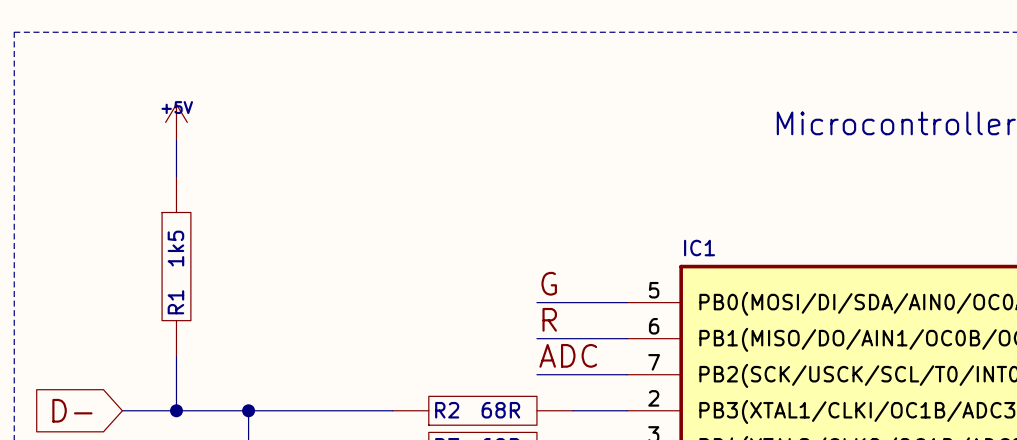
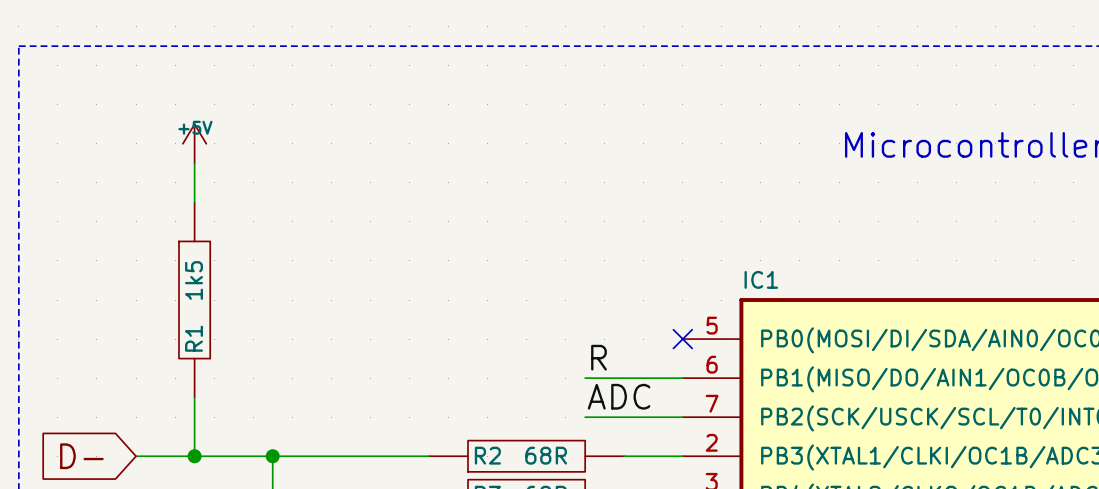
label: G (549, 283) -> none
wire: (536, 302) (627, 302) -> none
no-connect mark: none -> (682, 339)

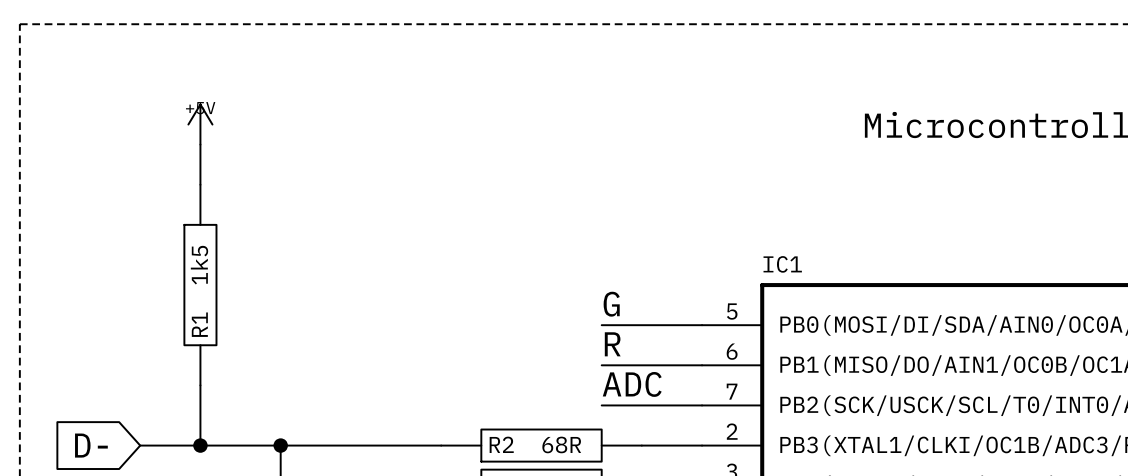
label: none -> G (611, 304)
wire: none -> (601, 325) (702, 325)
no-connect mark: (682, 339) -> none

